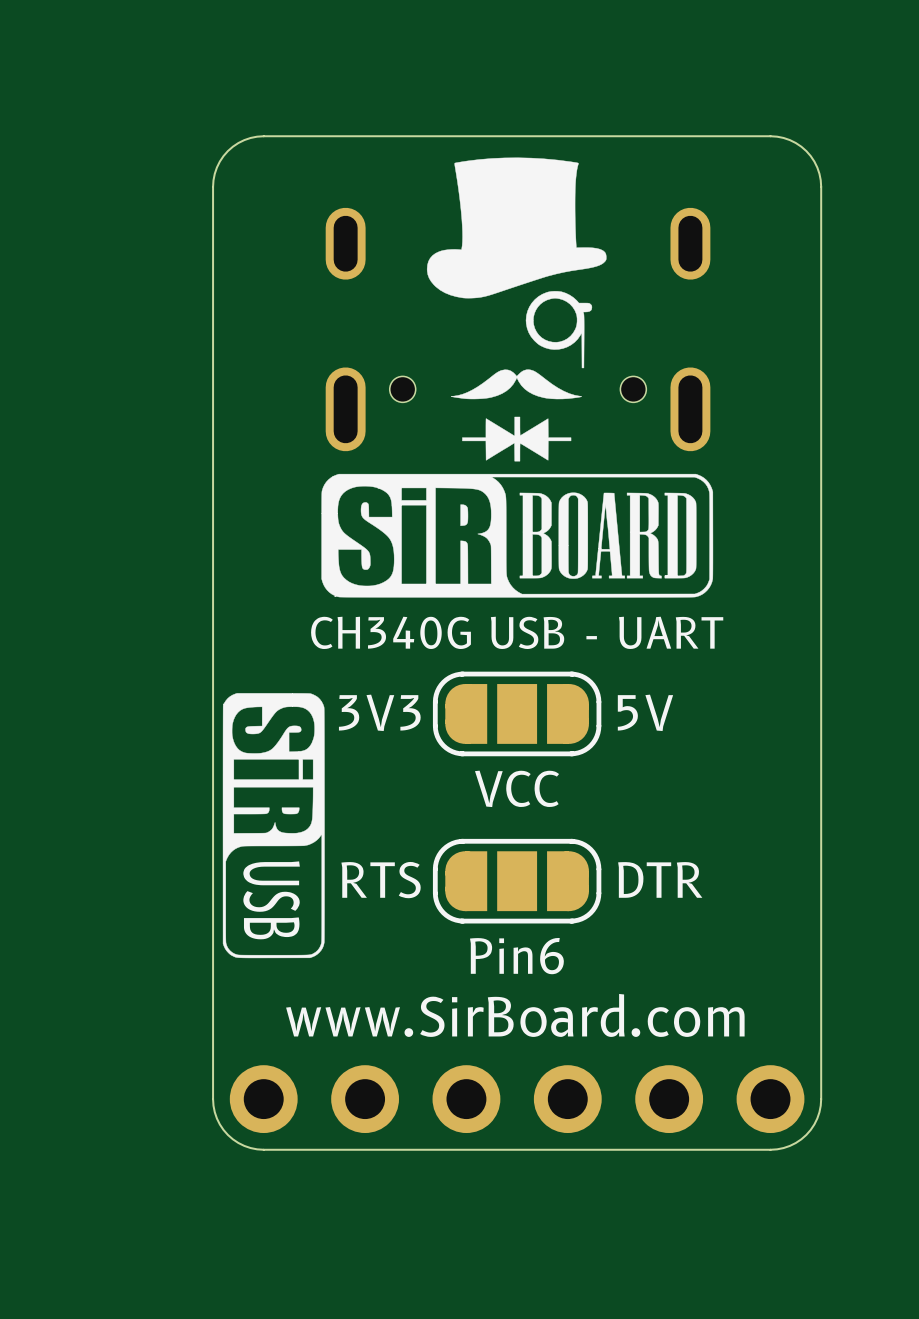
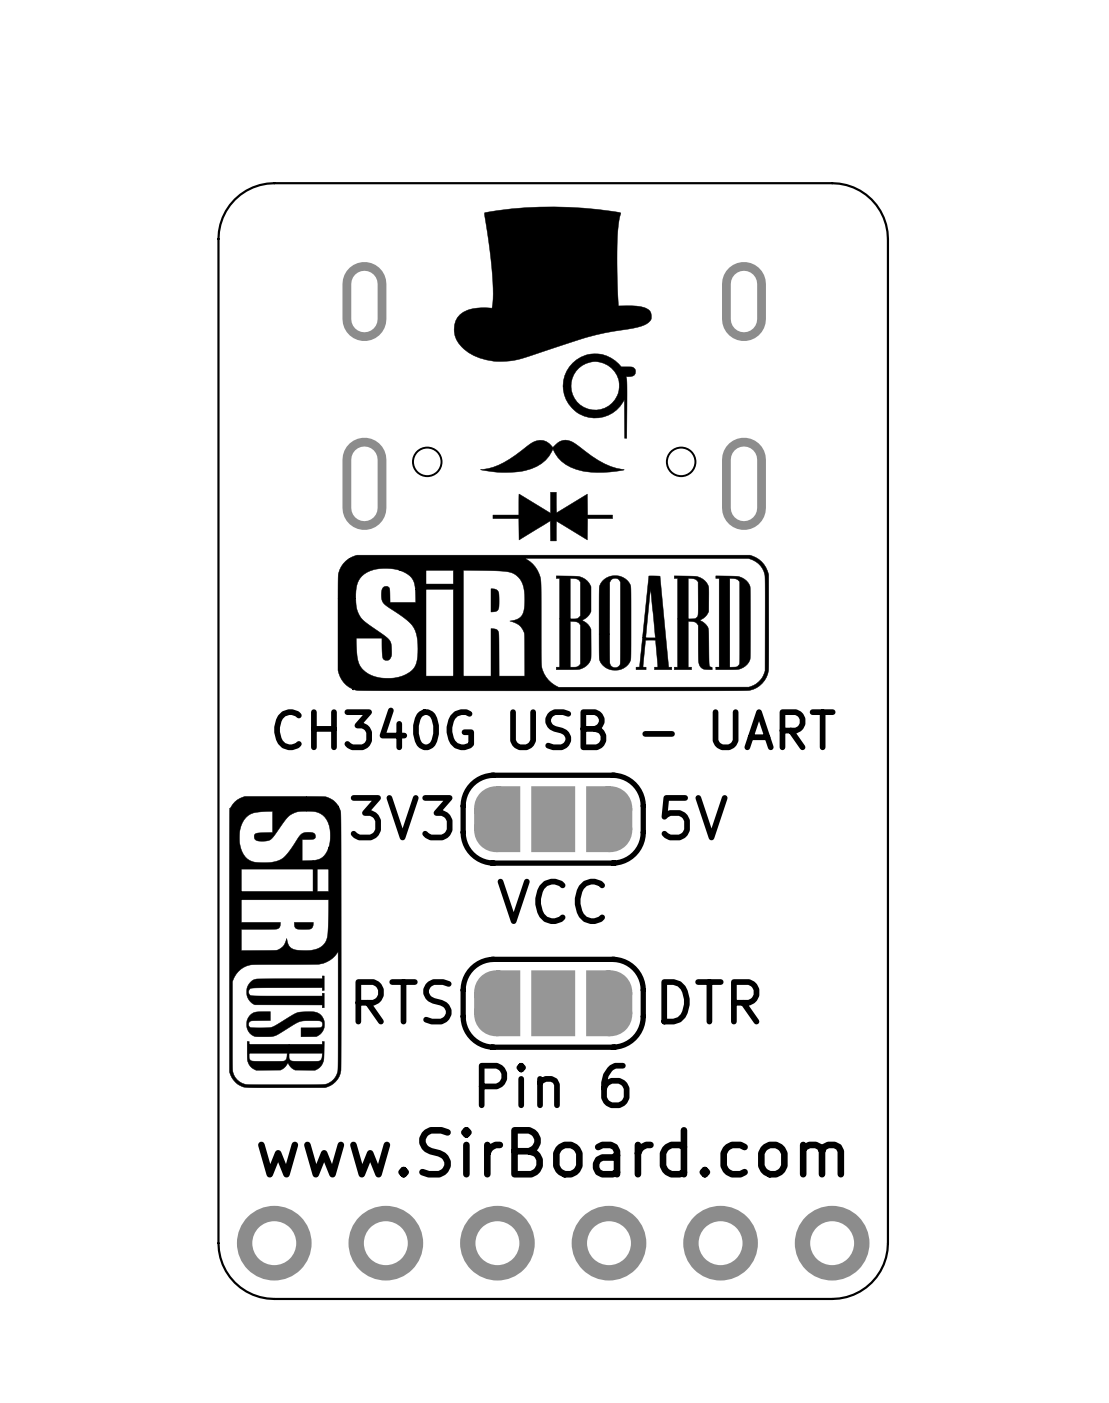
drawing shape: [222, 693, 325, 959] -> [229, 796, 342, 1089]
text: USB (271, 900) -> none
Pin6 name: Pin6 (516, 956) -> Pin 6 (554, 1085)

